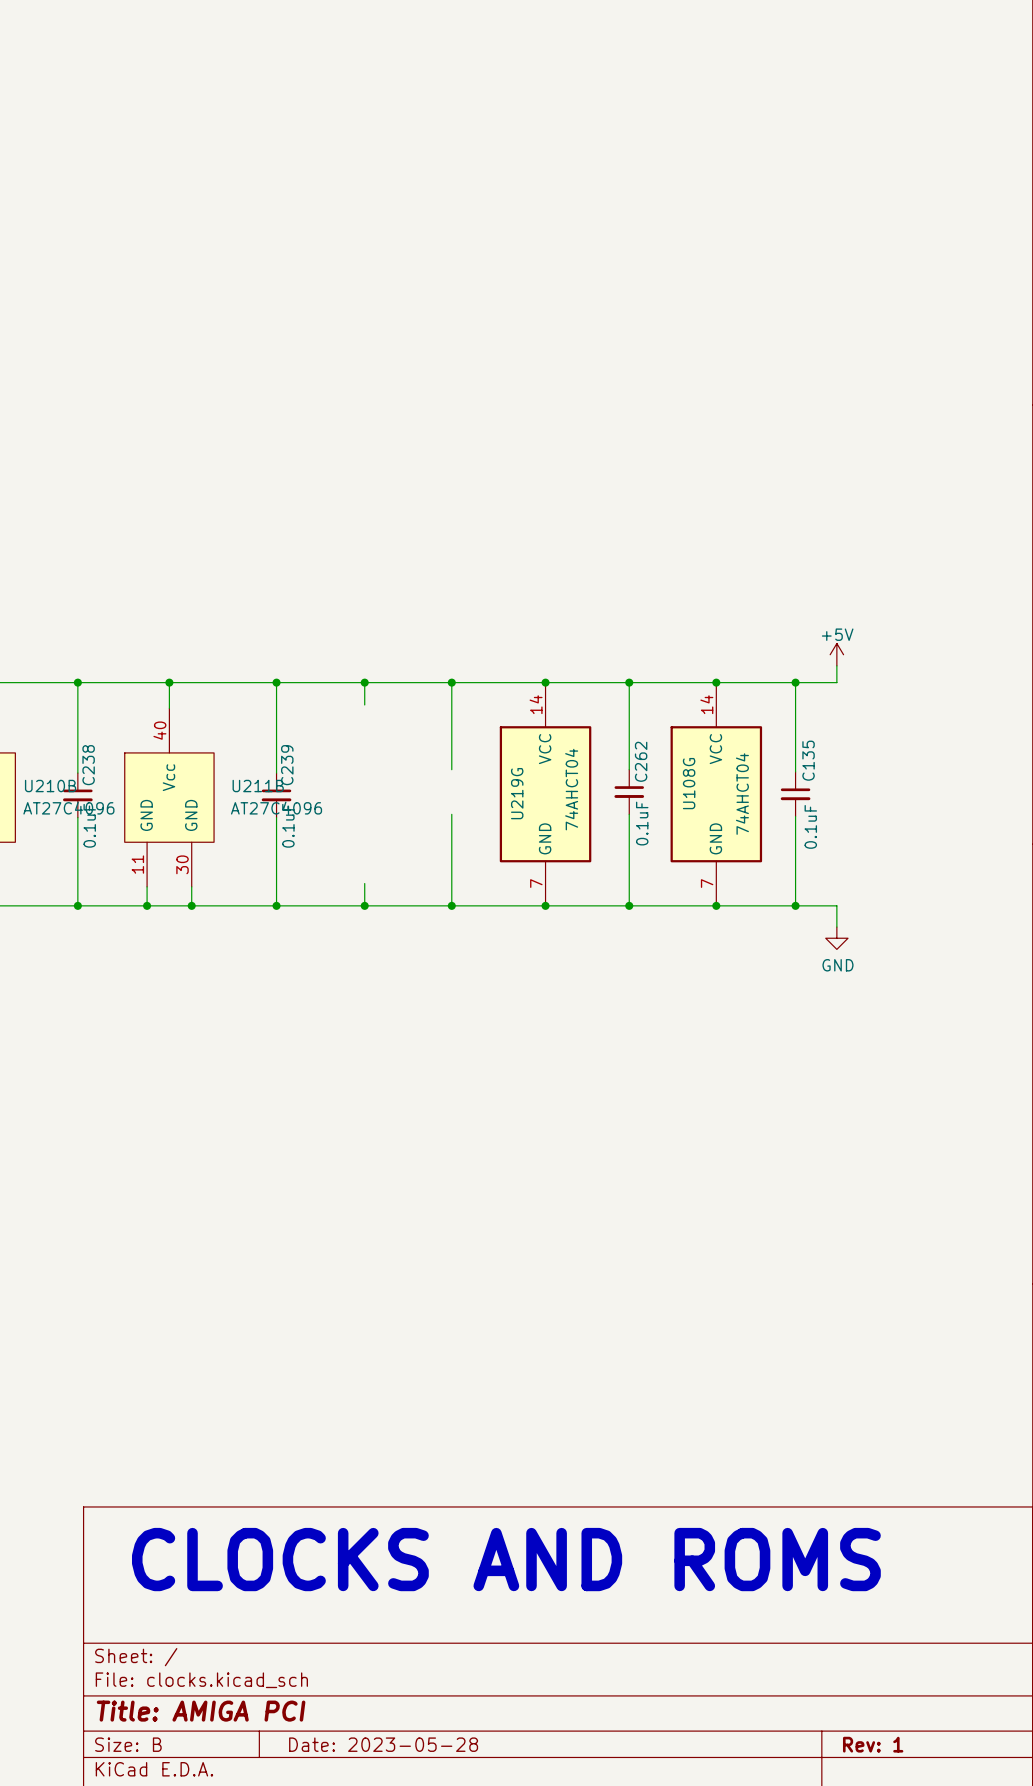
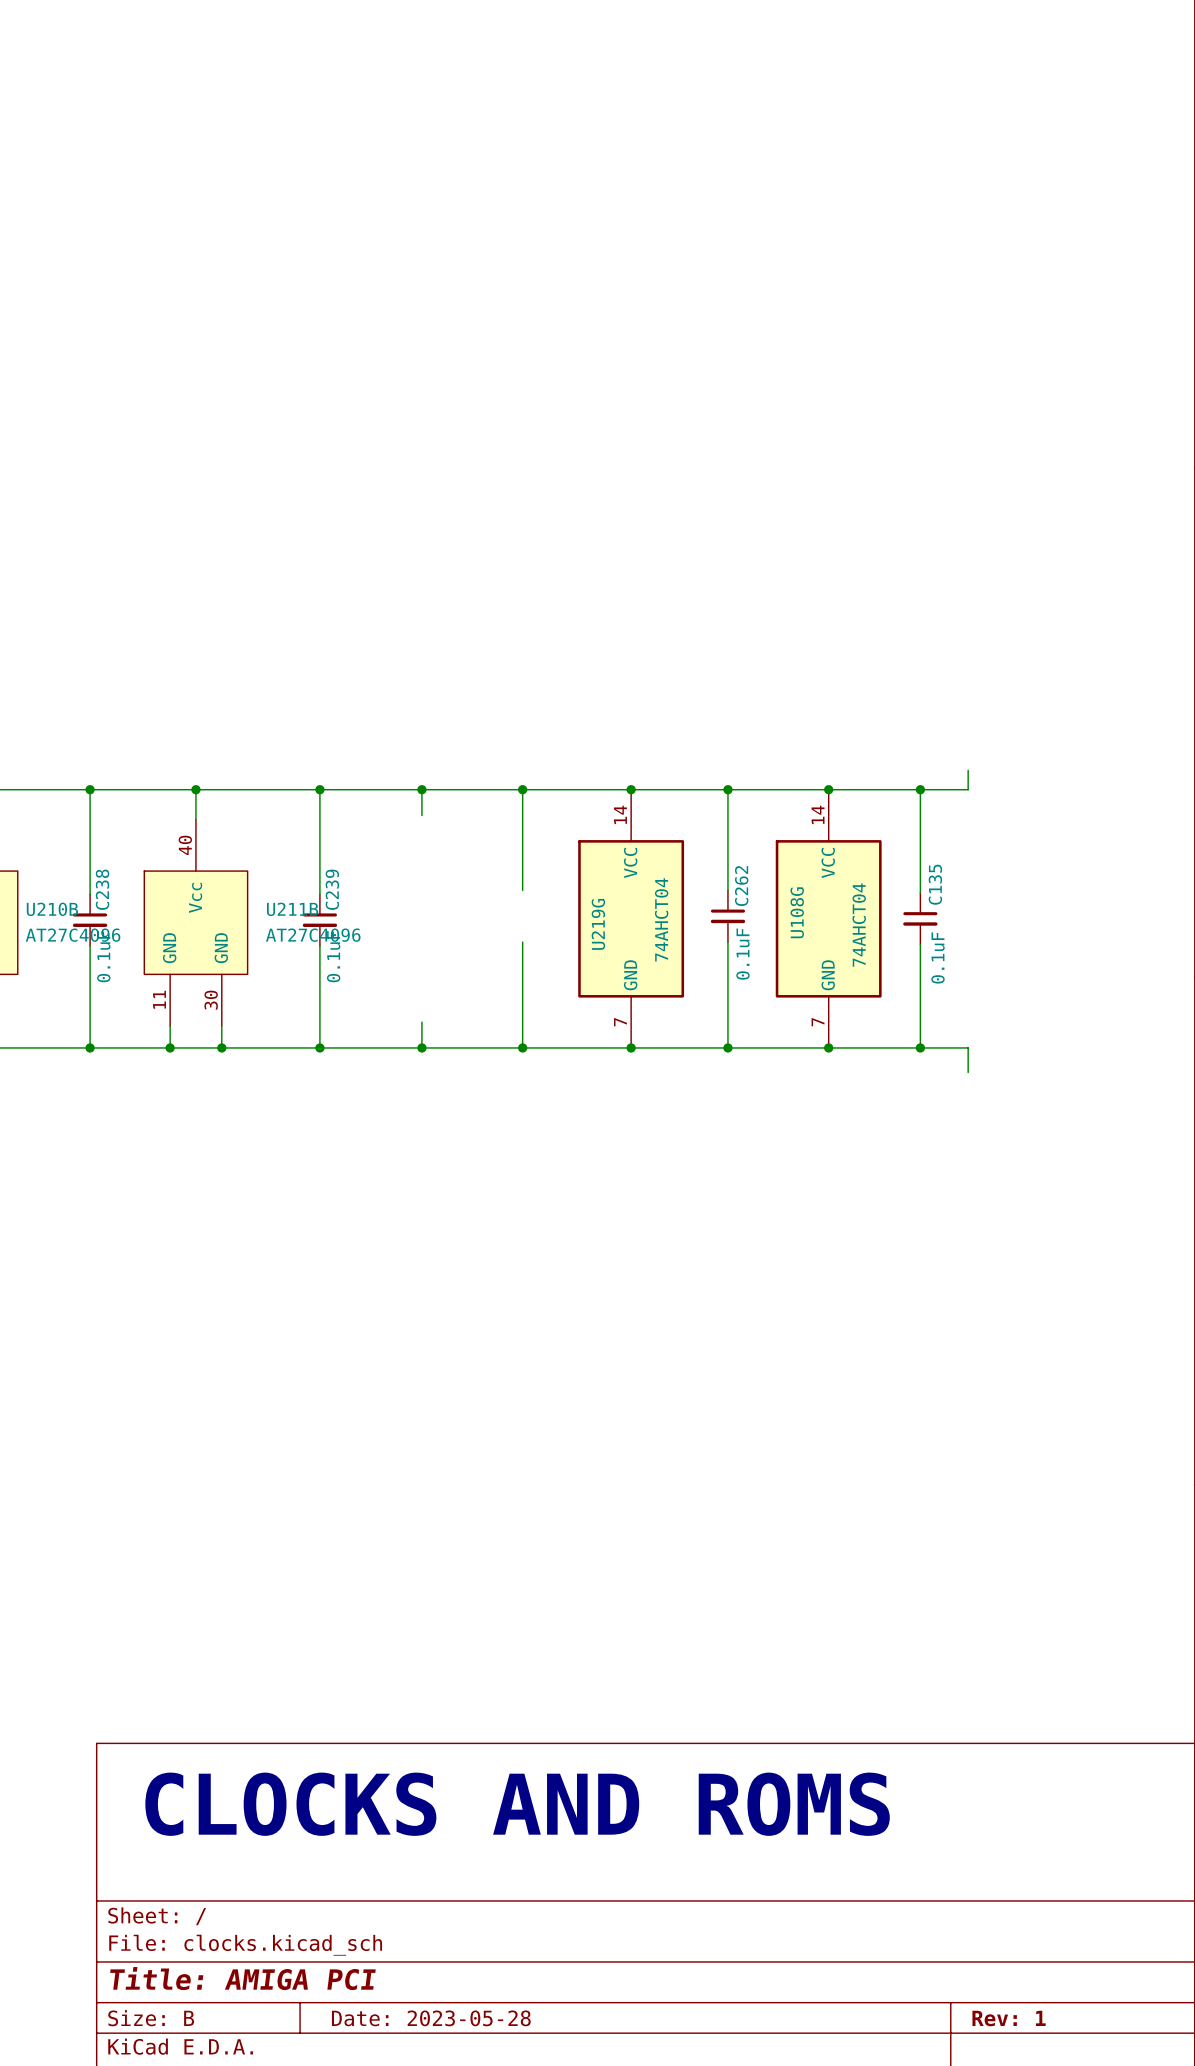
power symbol: +5V (836, 654) -> none
power symbol: GND (836, 938) -> none

